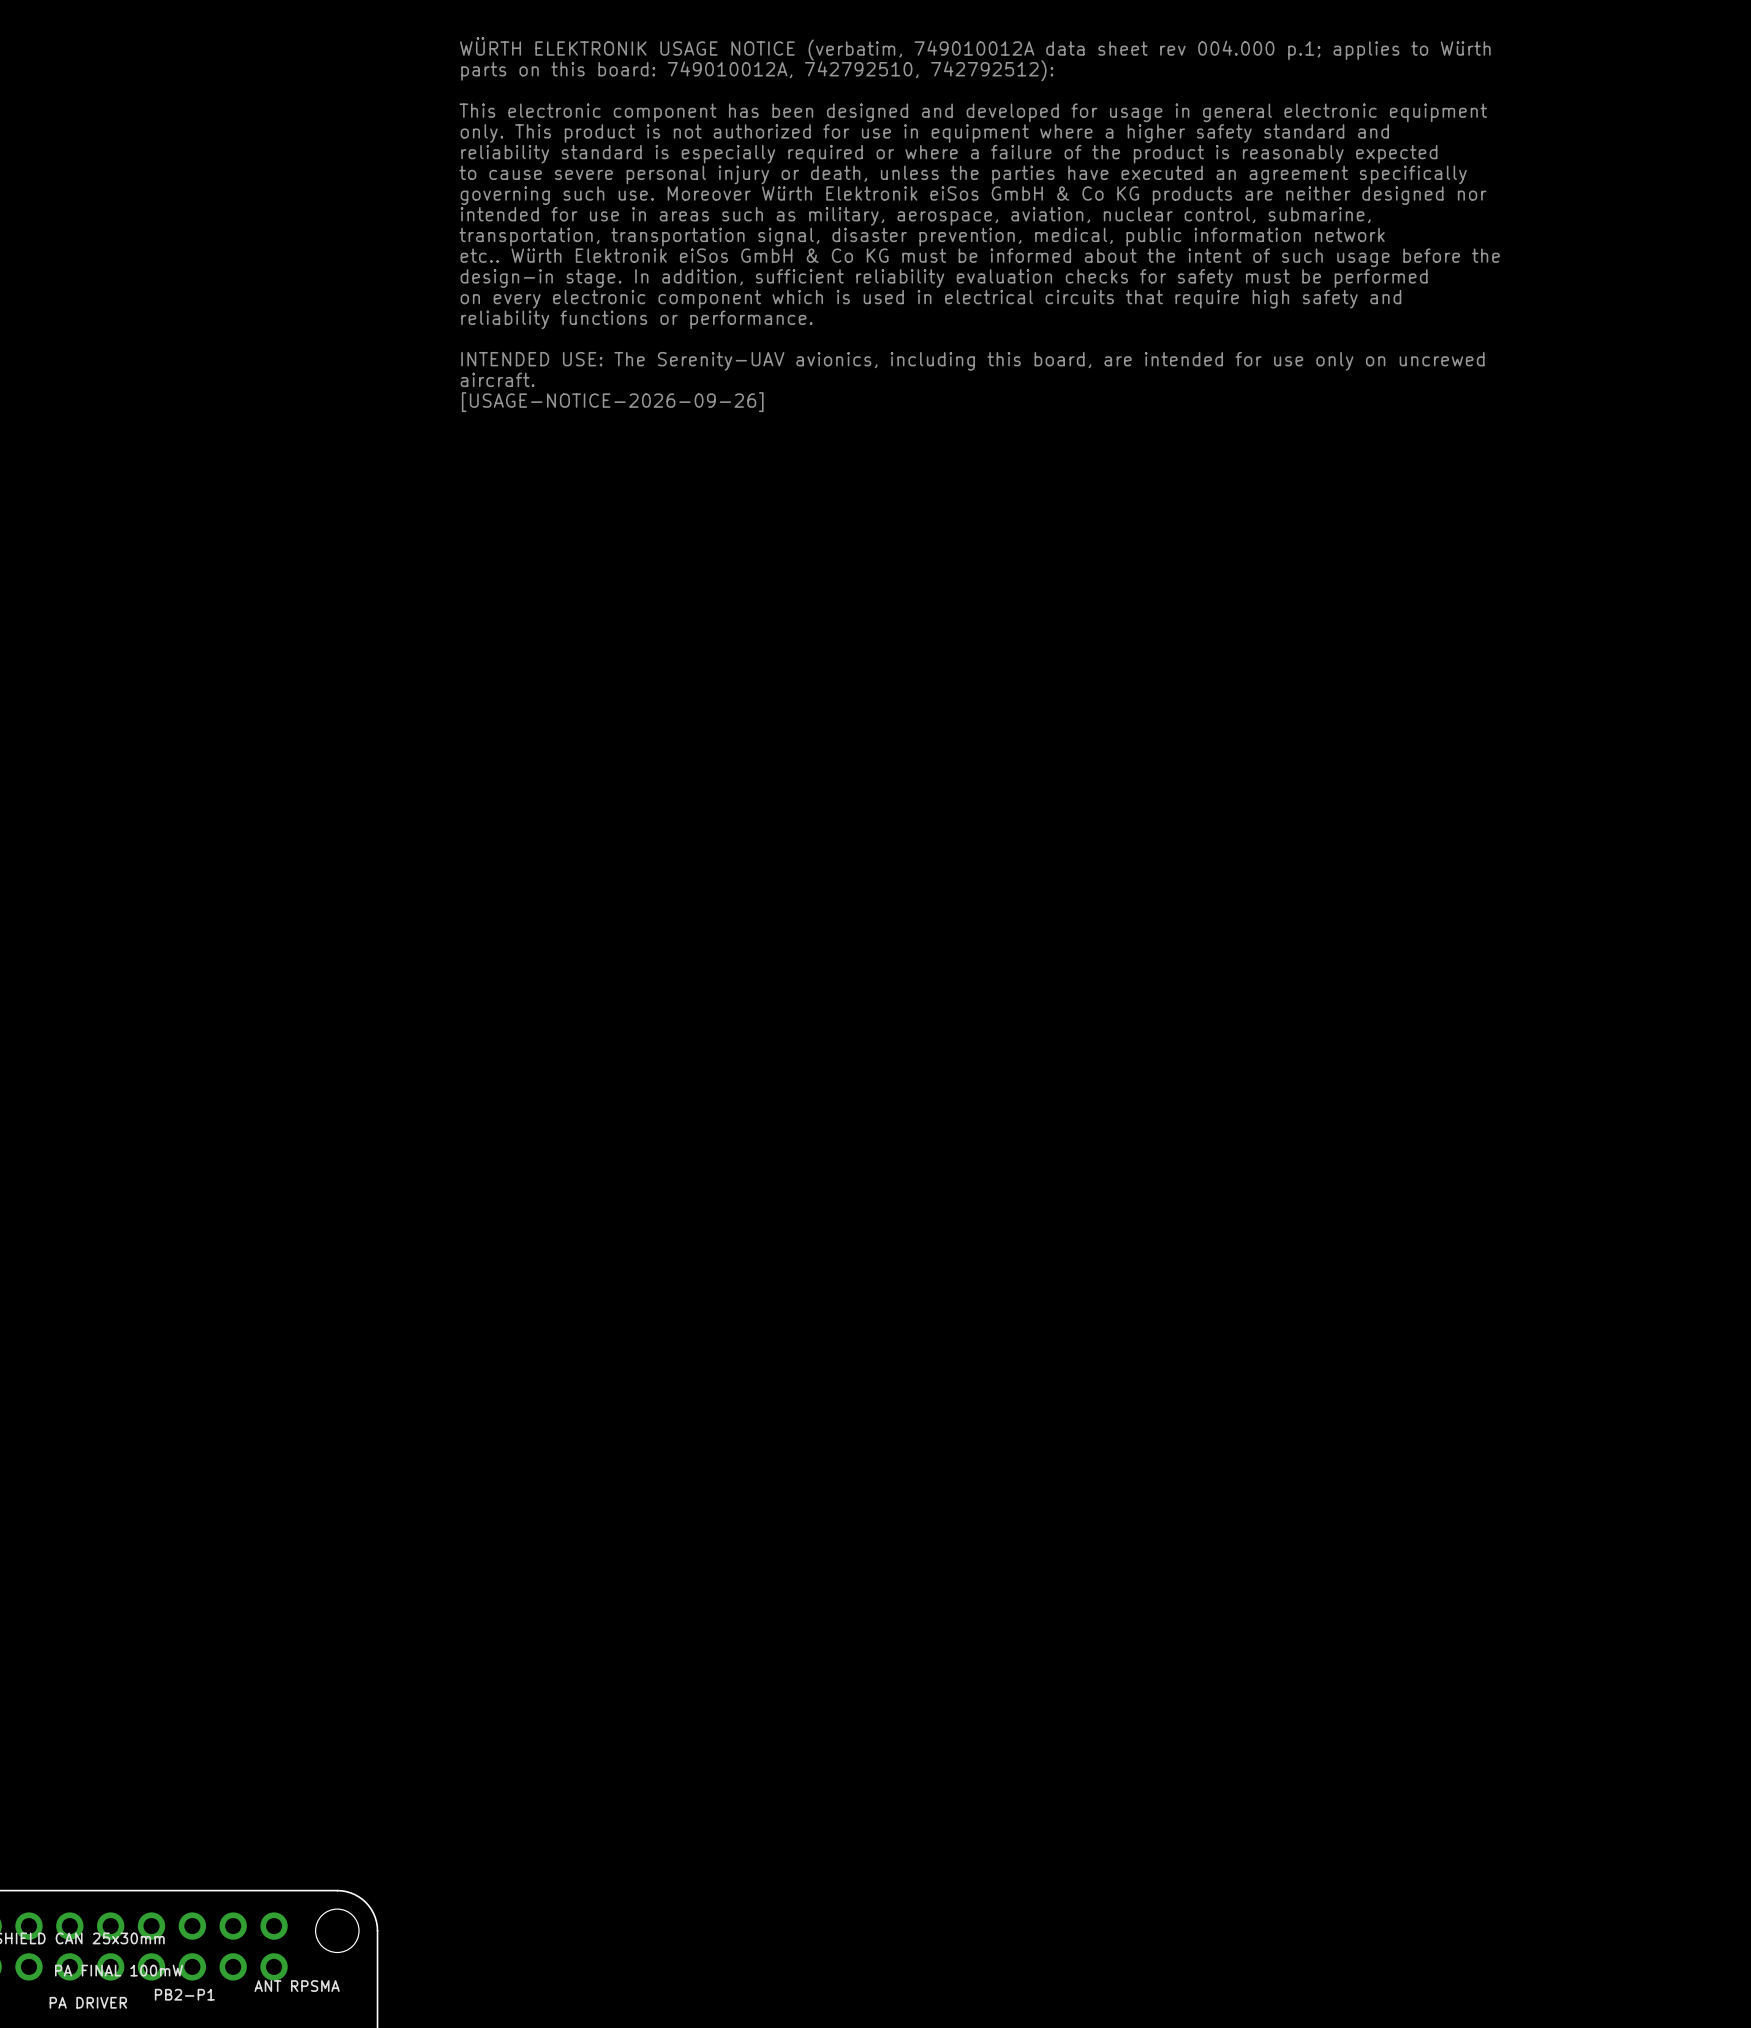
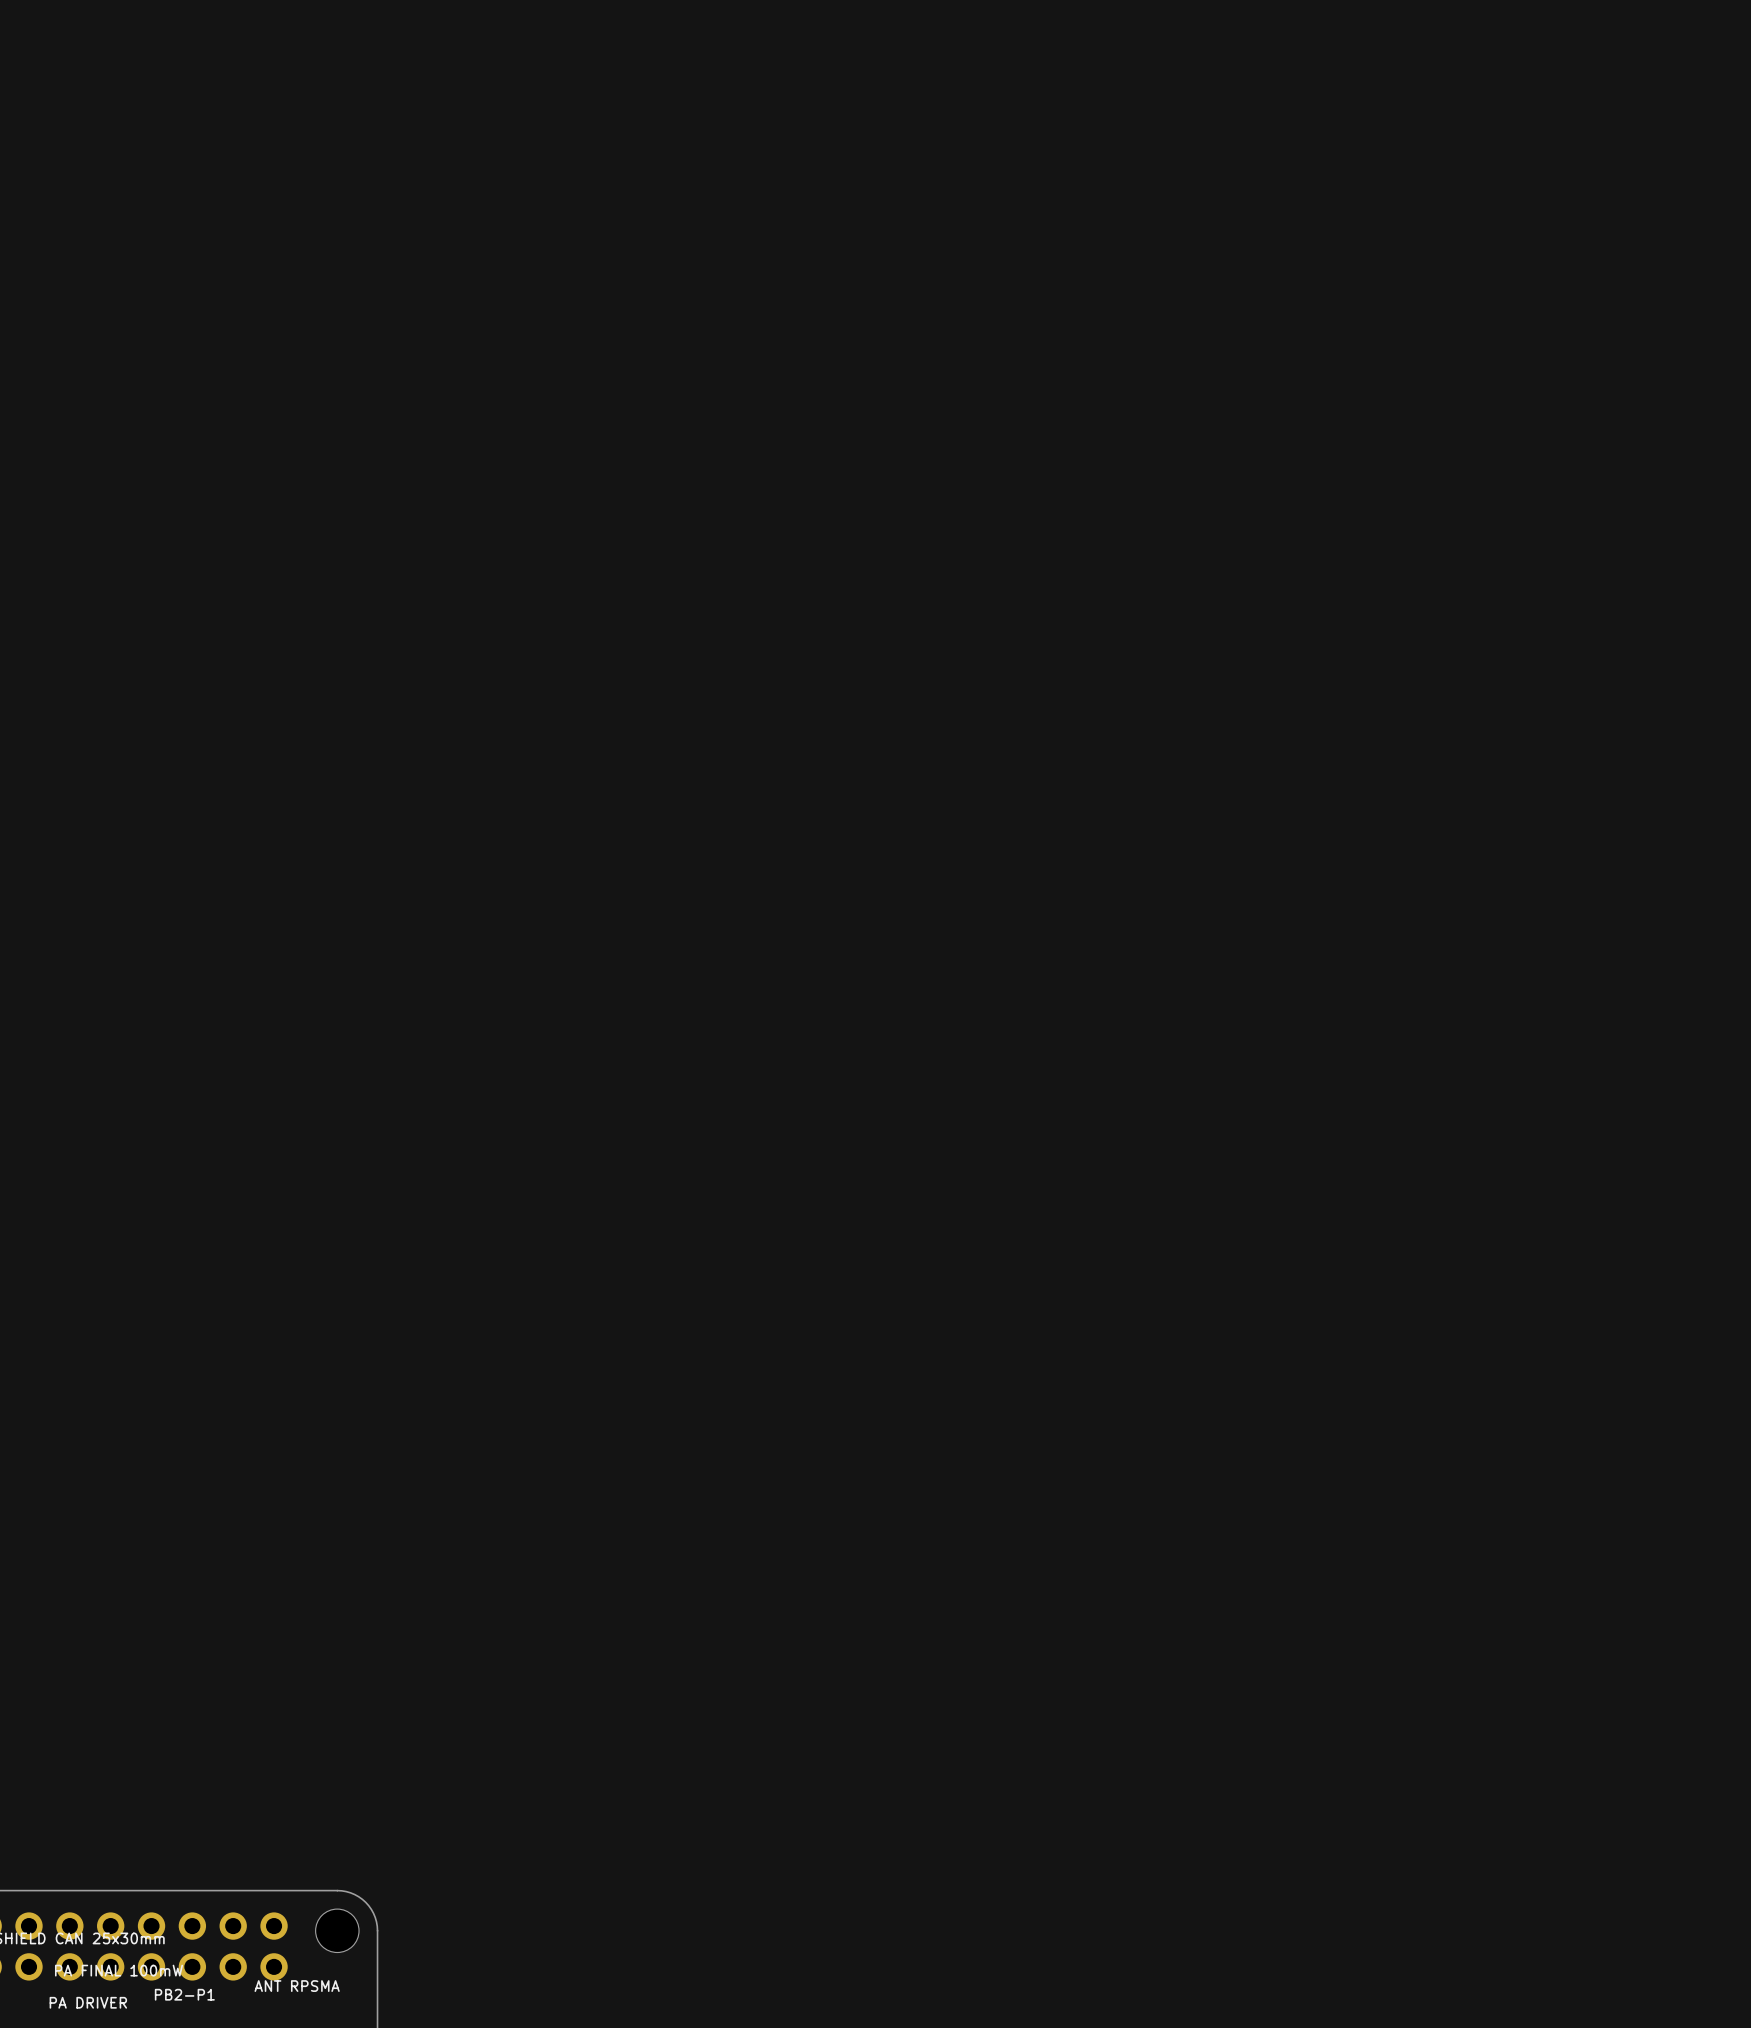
text: WÜRTH ELEKTRONIK USAGE NOTICE (verbatim, 749010012A data sheet rev 004.000 p.1; applies to Würth (975, 48) -> none
text: parts on this board: 749010012A, 742792510, 742792512): (757, 70) -> none
text: This electronic component has been designed and developed for usage in general electronic equipment (973, 112) -> none
text: only. This product is not authorized for use in equipment where a higher safety standard and (924, 133) -> none
text: reliability standard is especially required or where a failure of the product is reasonably expected (949, 154) -> none
text: to cause severe personal injury or death, unless the parties have executed an agreement specifically (963, 174) -> none
text: governing such use. Moreover Würth Elektronik eiSos GmbH & Co KG products are neither designed nor (973, 195) -> none
text: intended for use in areas such as military, aerospace, aviation, nuclear control, submarine, (915, 216) -> none
text: transportation, transportation signal, disaster prevention, medical, public information network (922, 237) -> none
text: etc.. Würth Elektronik eiSos GmbH & Co KG must be informed about the intent of such usage before the (980, 257) -> none
text: design-in stage. In addition, sufficient reliability evaluation checks for safety must be performed (944, 278) -> none
text: on every electronic component which is used in electrical circuits that require high safety and (930, 299) -> none
text: reliability functions or performance. (636, 319) -> none
text: INTENDED USE: The Serenity-UAV avionics, including this board, are intended for use only on uncrewed (972, 361) -> none
text: aircraft. (497, 379) -> none
text: [USAGE-NOTICE-2026-09-26] (612, 402) -> none

